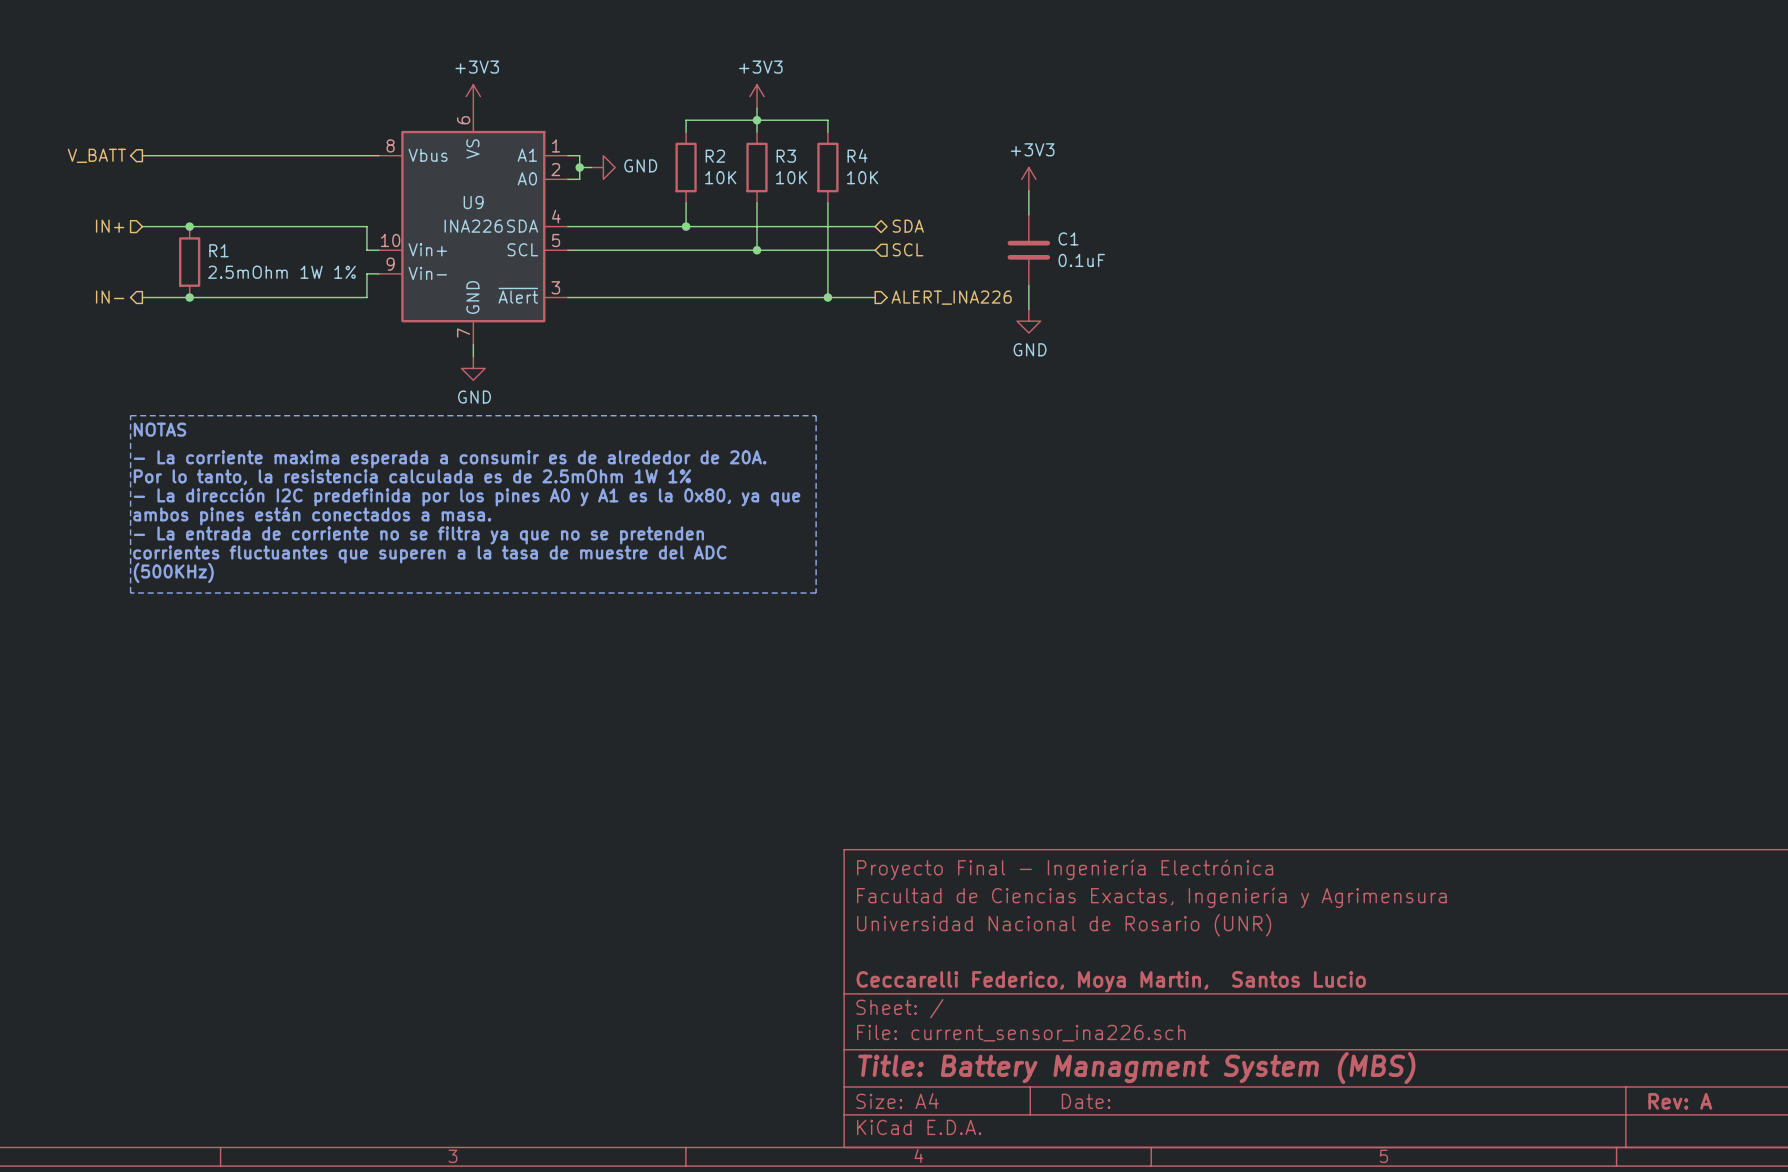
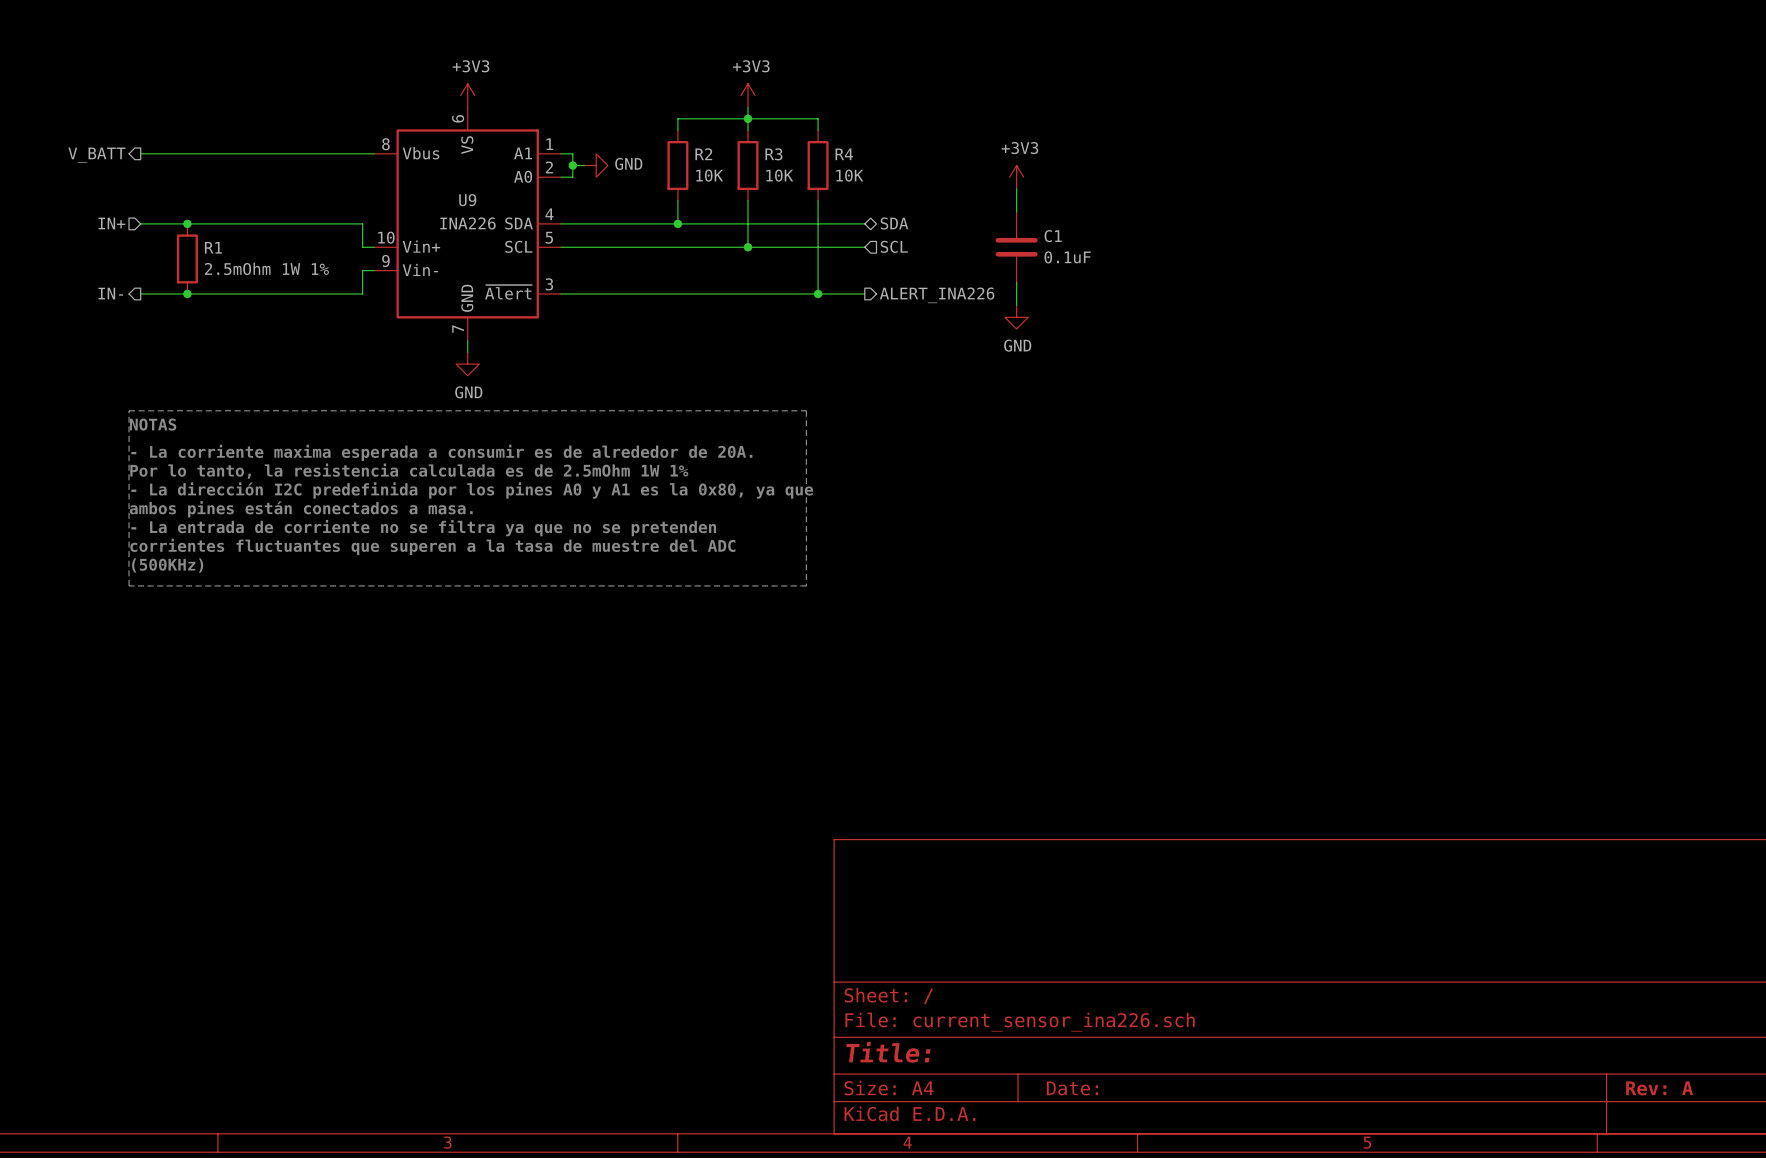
title block: Proyecto Final - Ingeniería Electrónica (1065, 869) -> none
title block: Facultad de Ciencias Exactas, Ingeniería y Agrimensura (1151, 897) -> none
title block: Universidad Nacional de Rosario (UNR) (1064, 925) -> none
title block: Ceccarelli Federico, Moya Martin, Santos Lucio (1111, 981) -> none
title block: Title: Battery Managment System (MBS) (1136, 1068) -> Title: (888, 1052)

